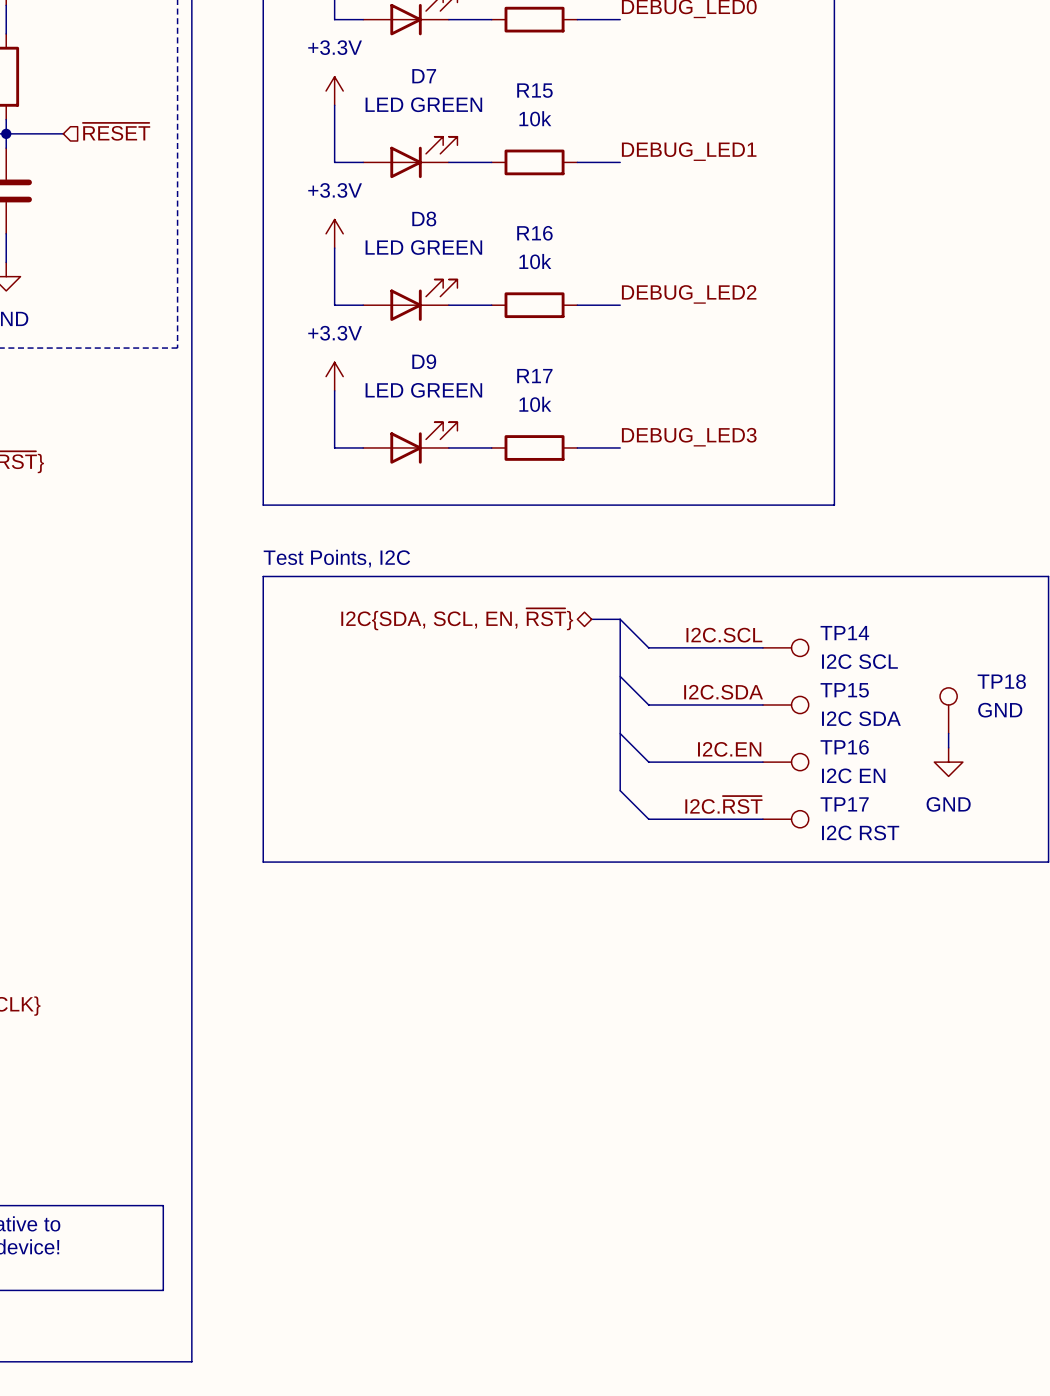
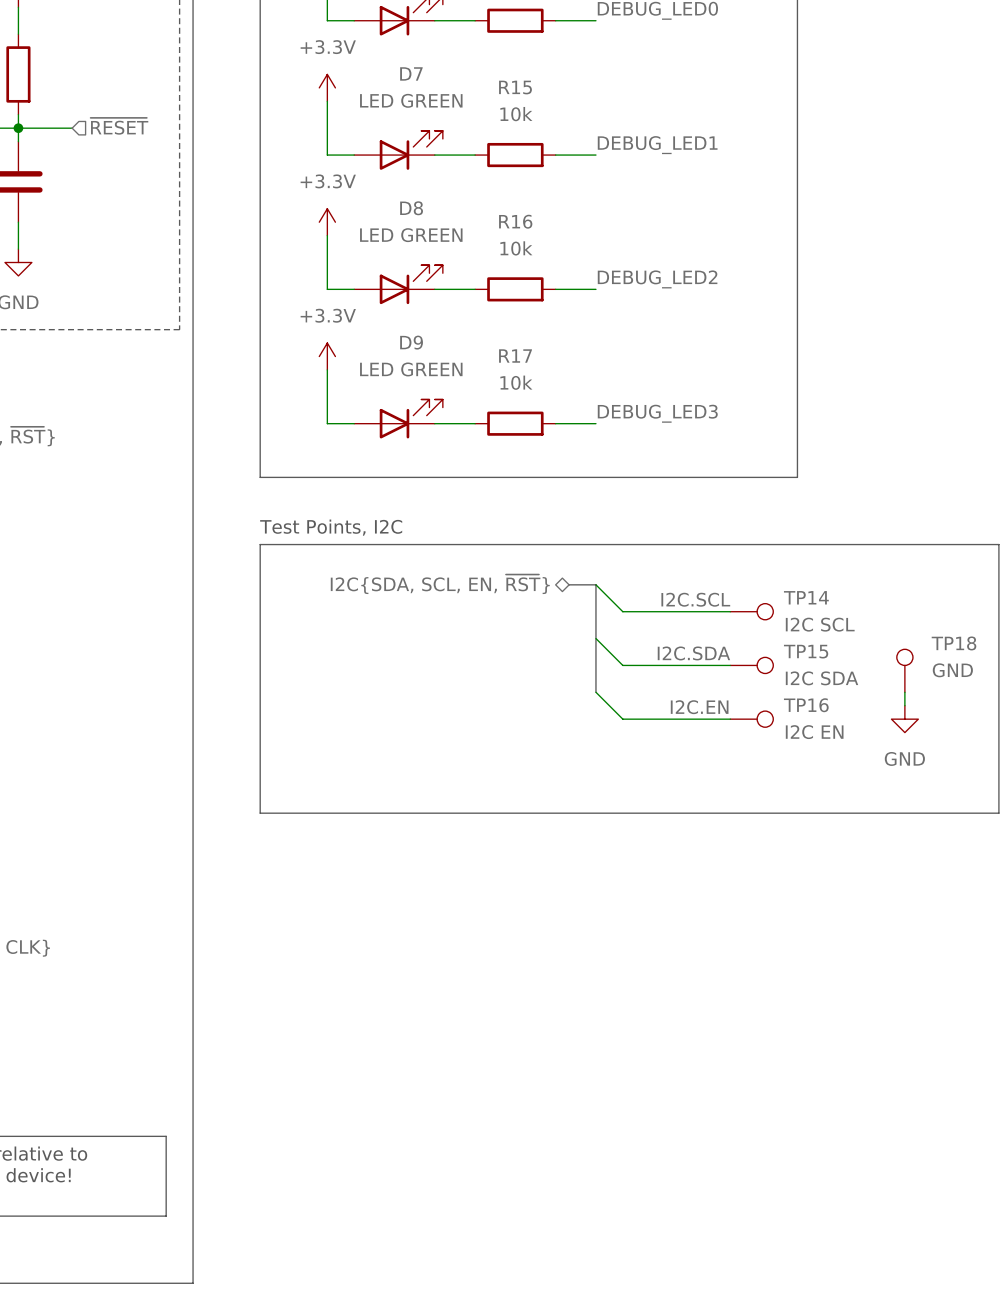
bus: (620, 733) (620, 790) -> none
wire: (620, 790) (648, 819) (762, 819) -> none
label: I2C.~{RST} (723, 804) -> none
TP17: I2C RST (785, 819) -> none

